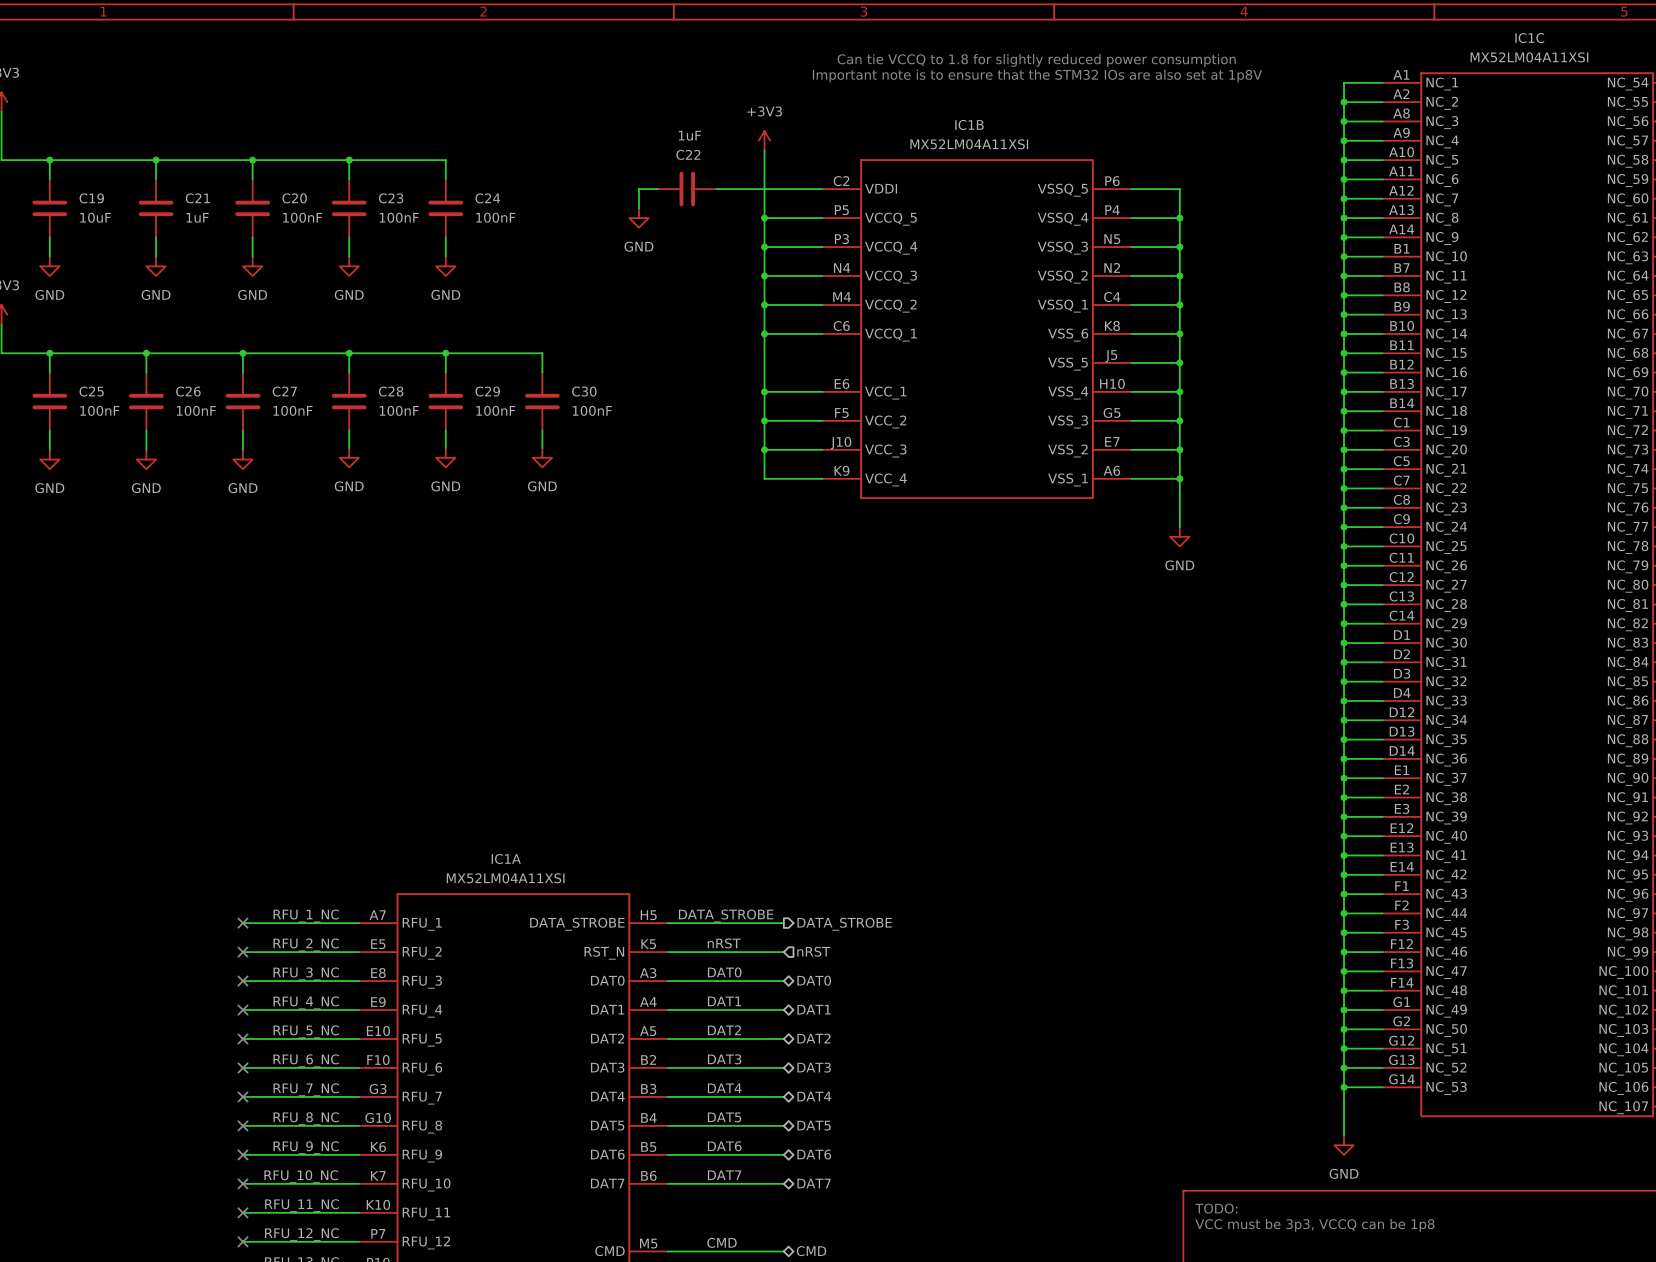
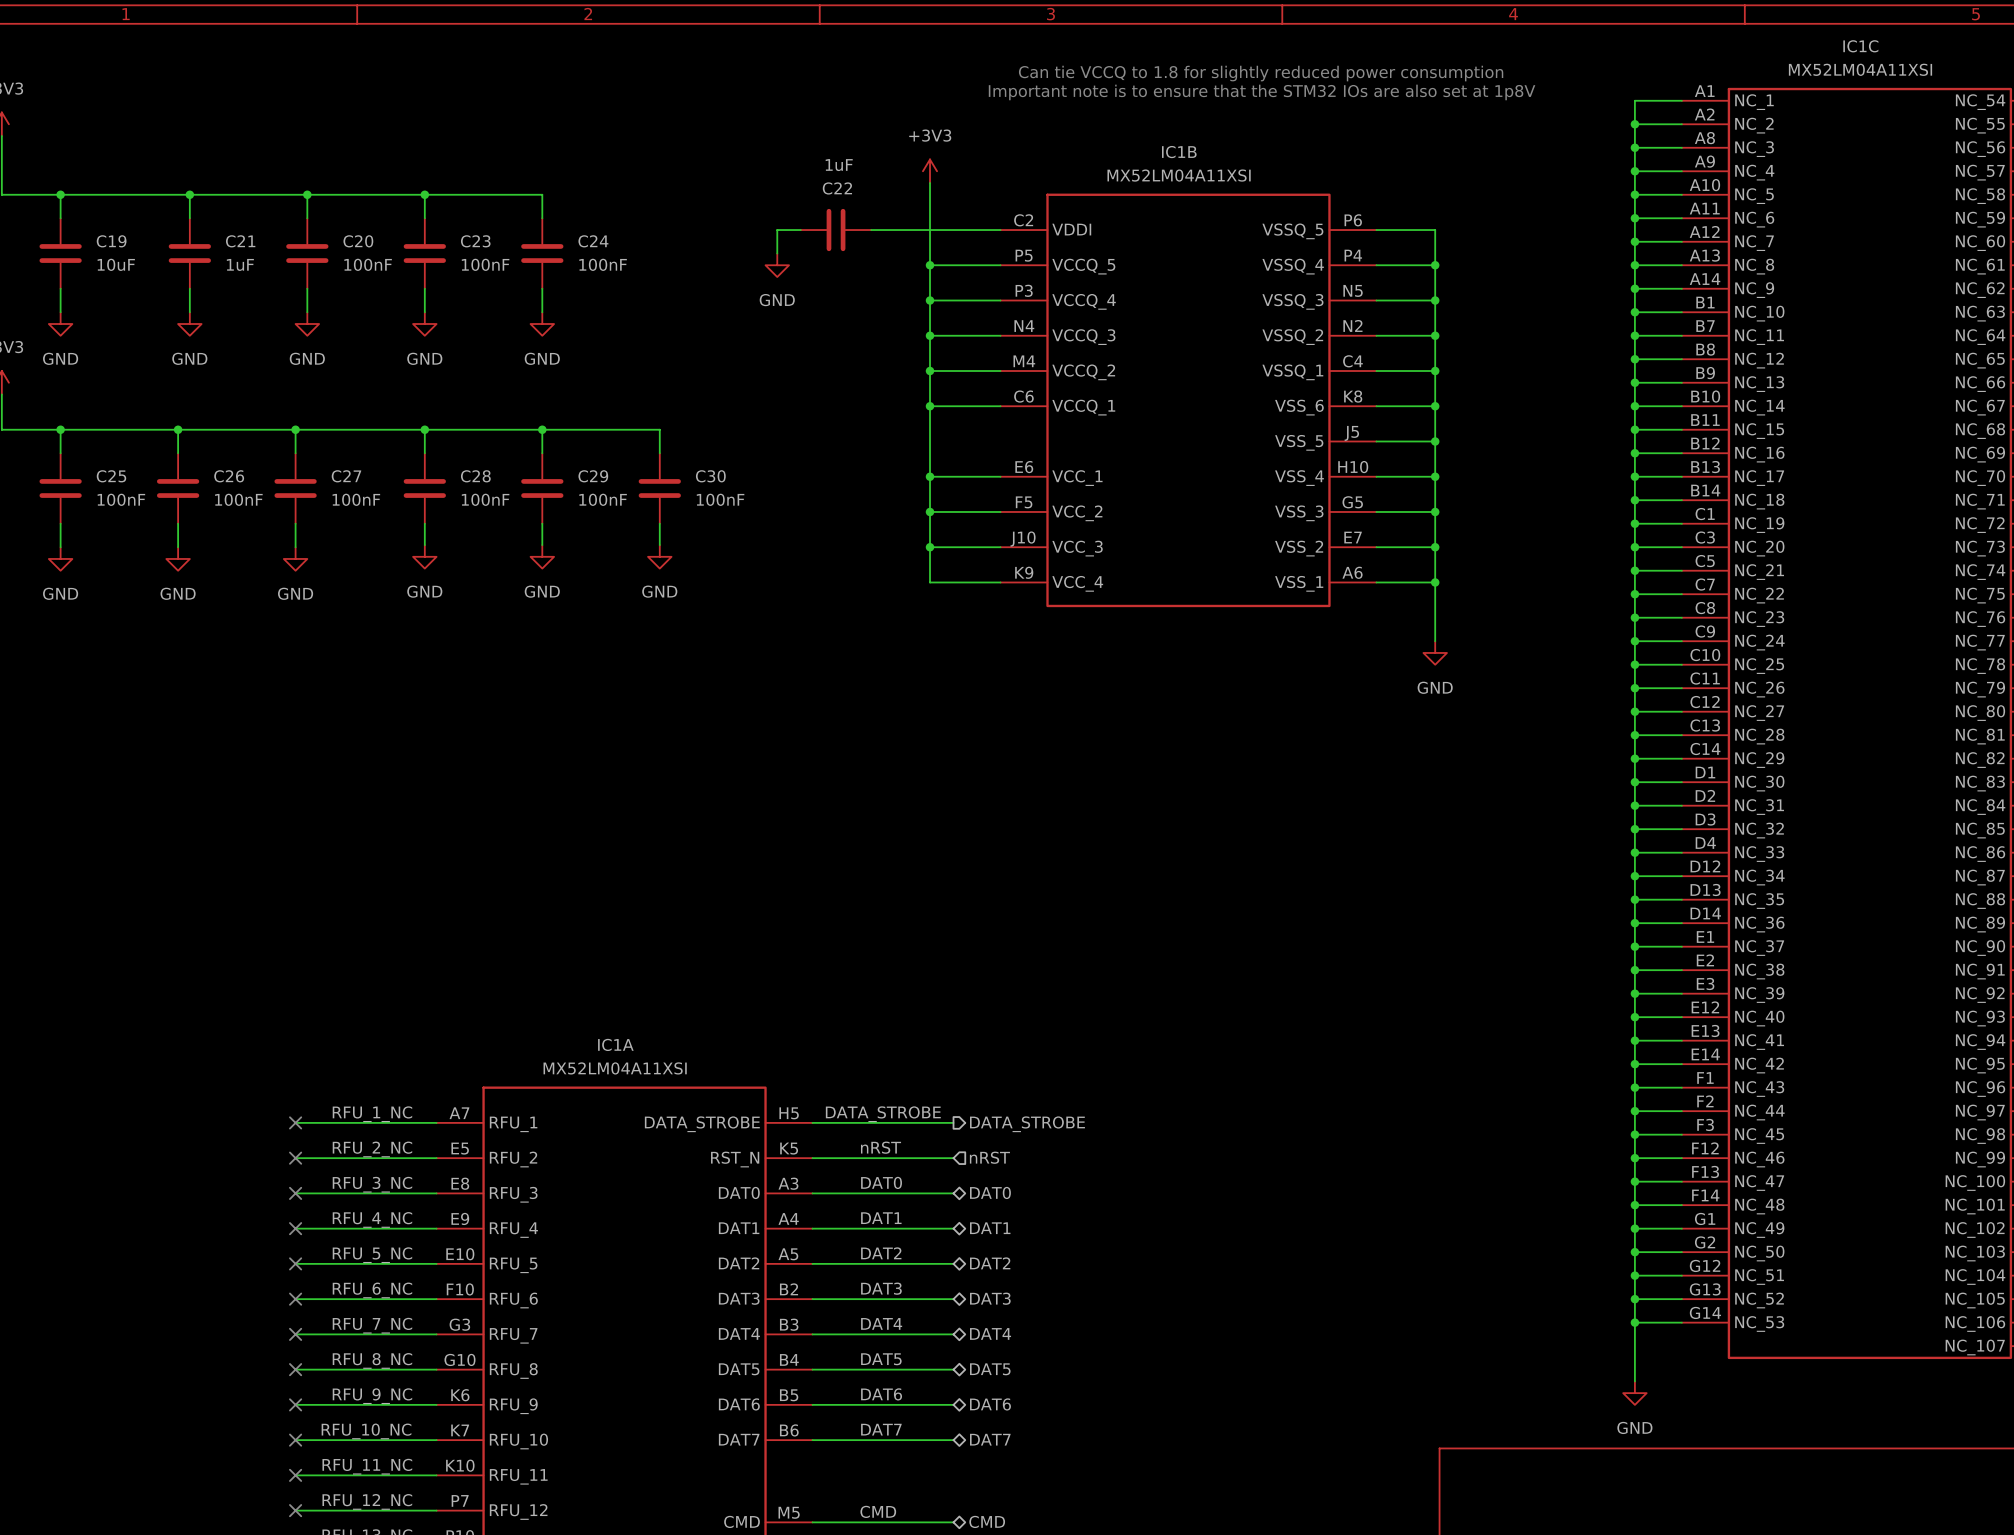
text: TODO: (1216, 1208) -> none
text: VCC must be 3p3, VCCQ can be 1p8 (1314, 1225) -> none

